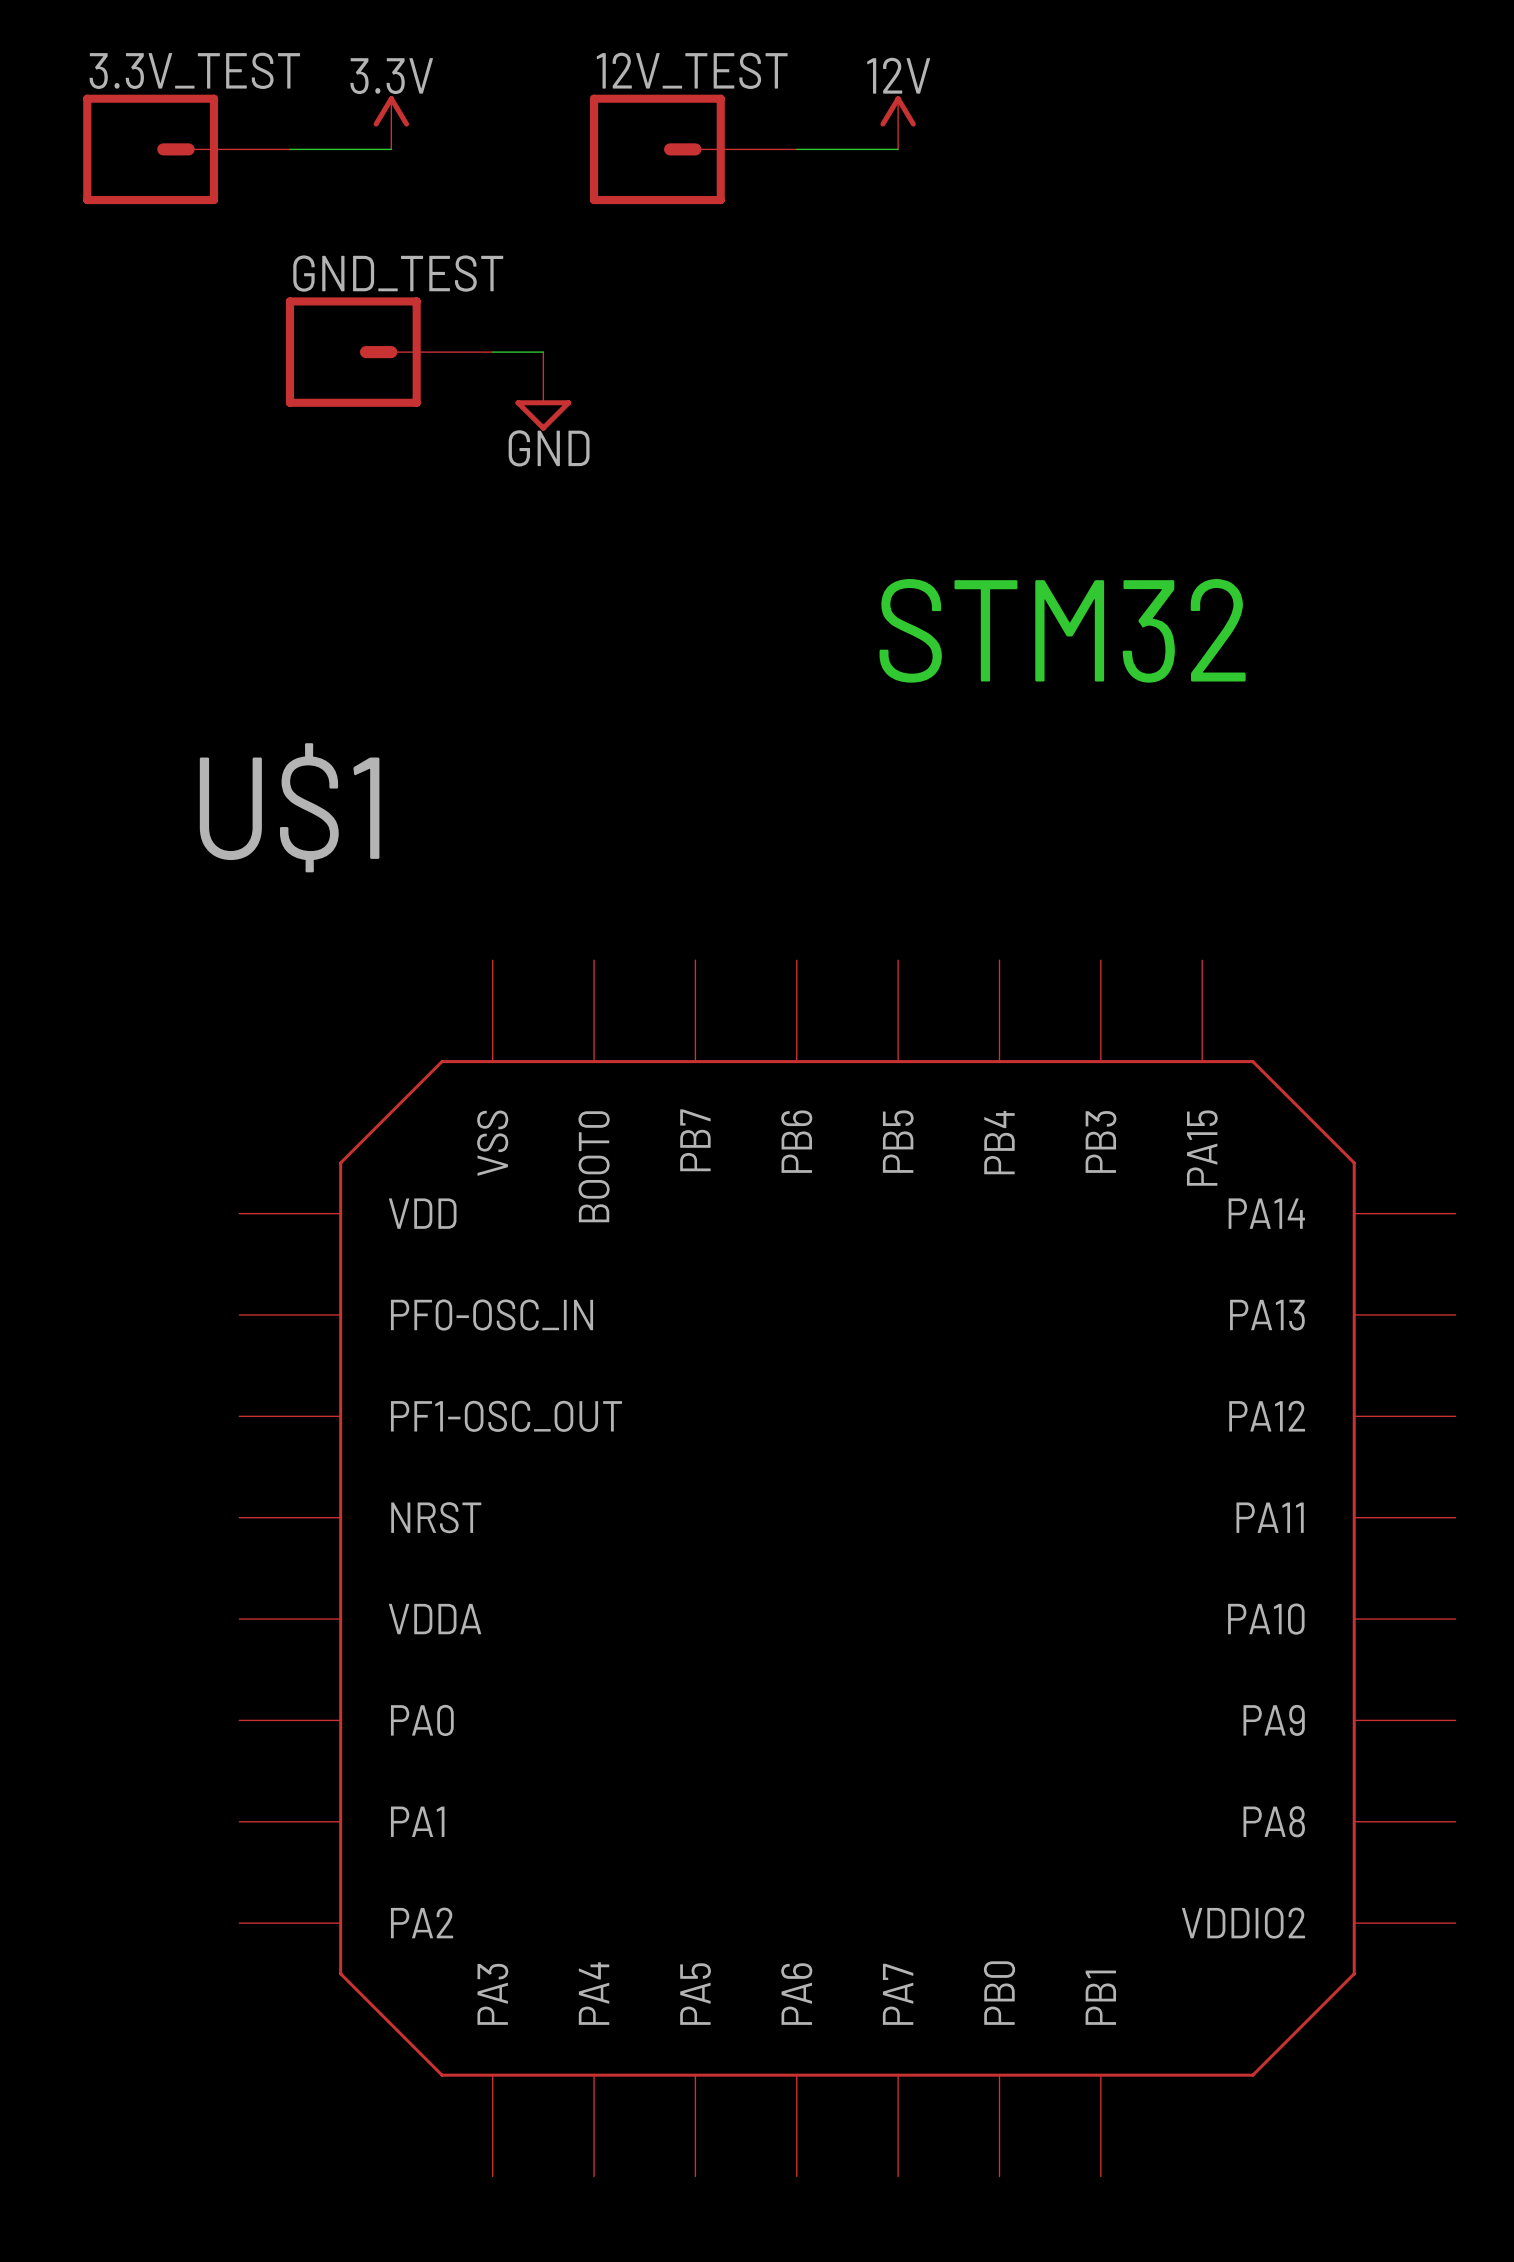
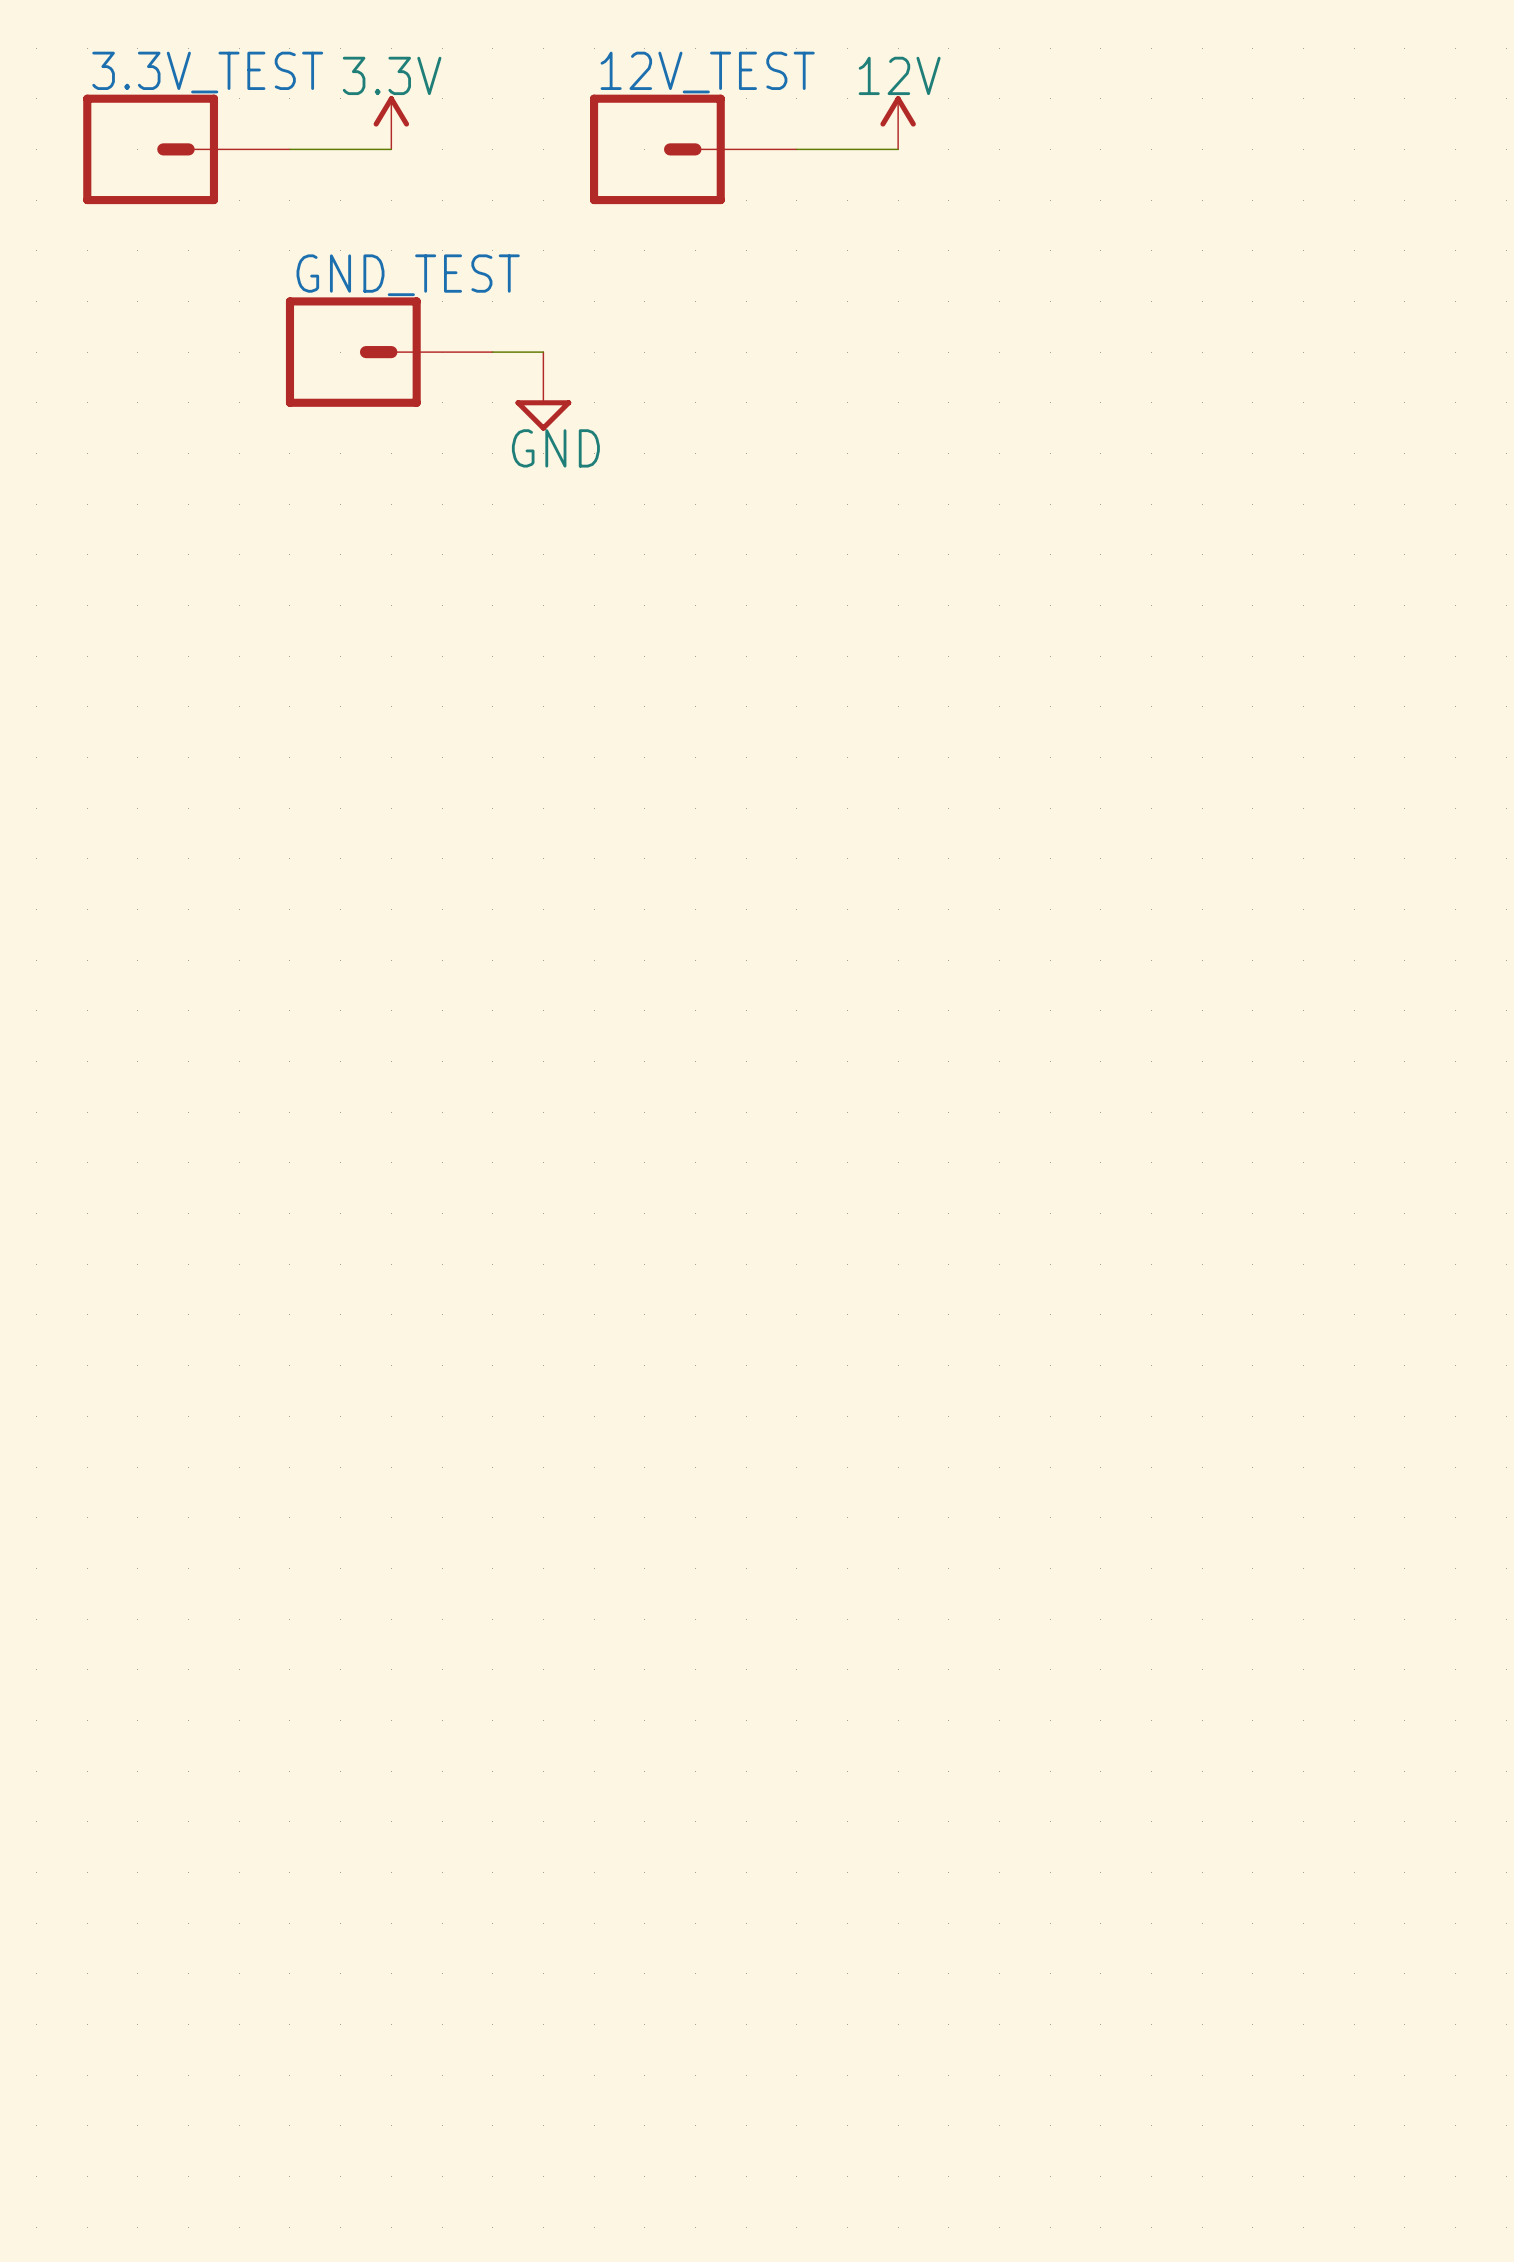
text: STM32 (1062, 630) -> none
U$1: (847, 1568) -> none

